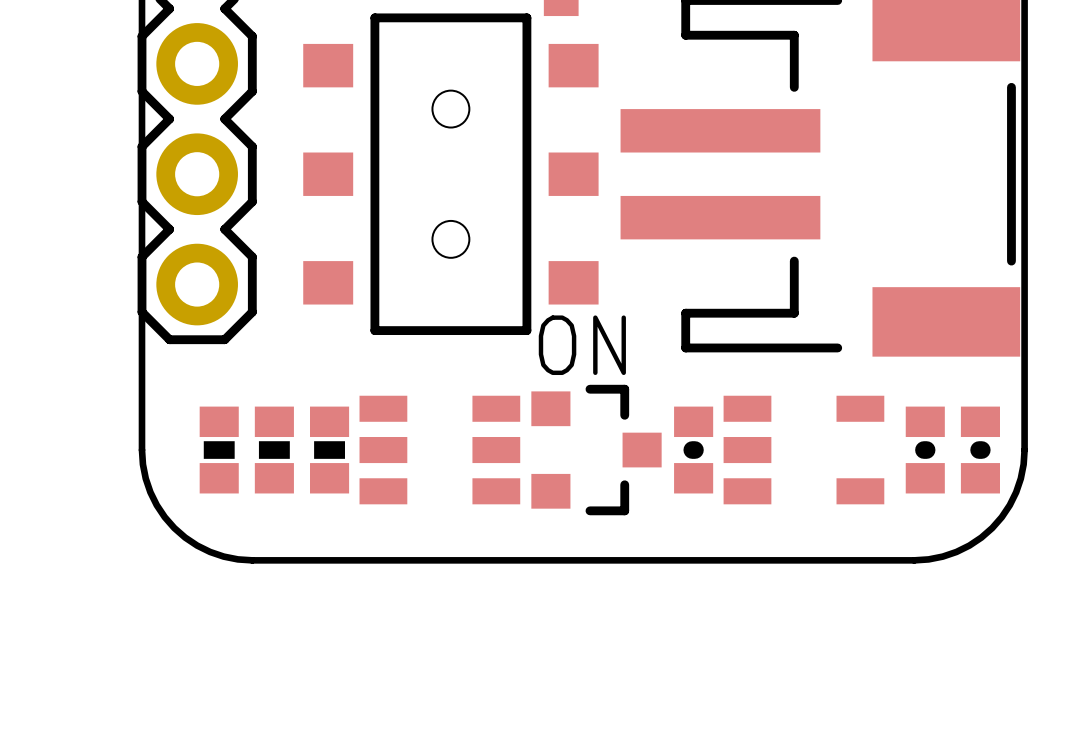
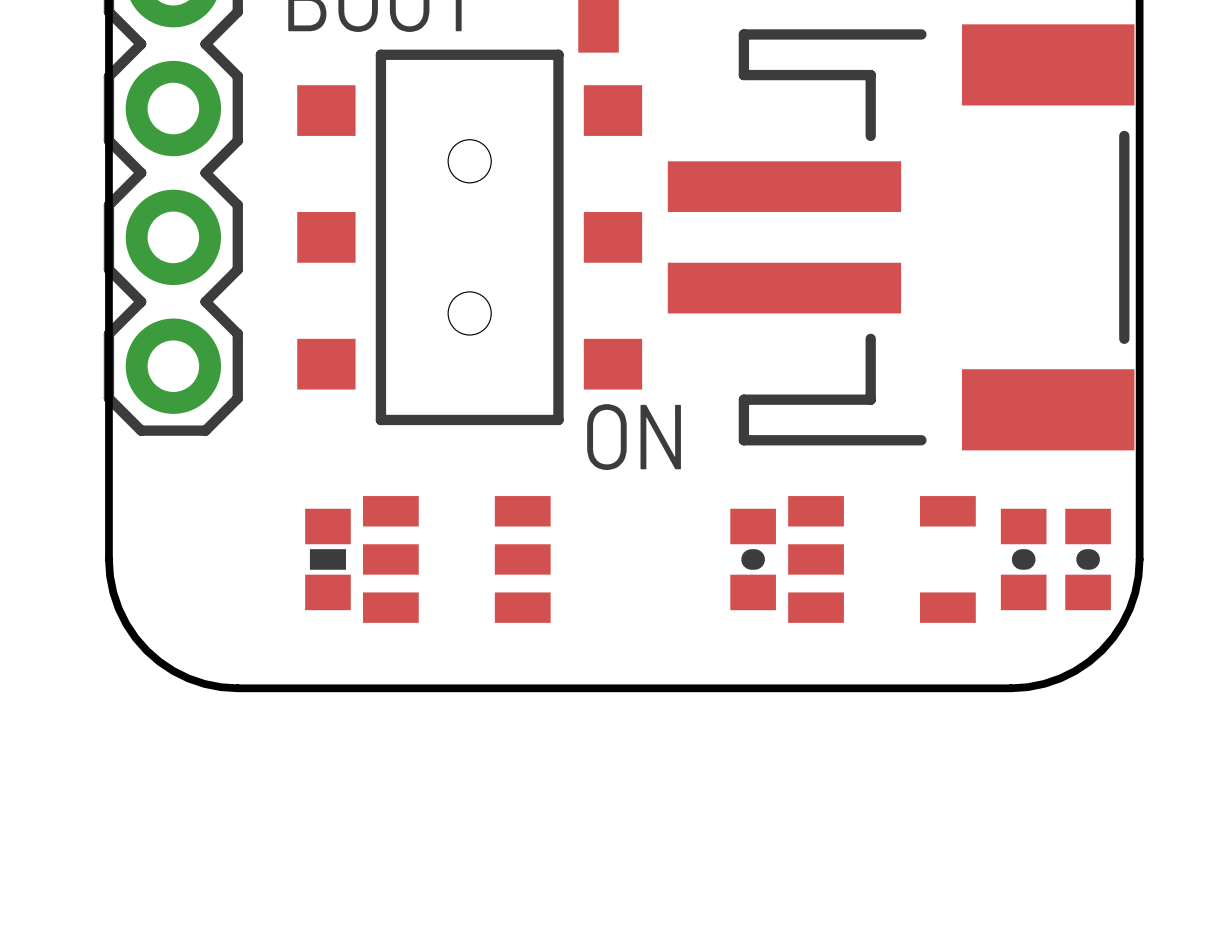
part: (219, 450) -> none
part: (274, 450) -> none
part: (596, 450) -> none

